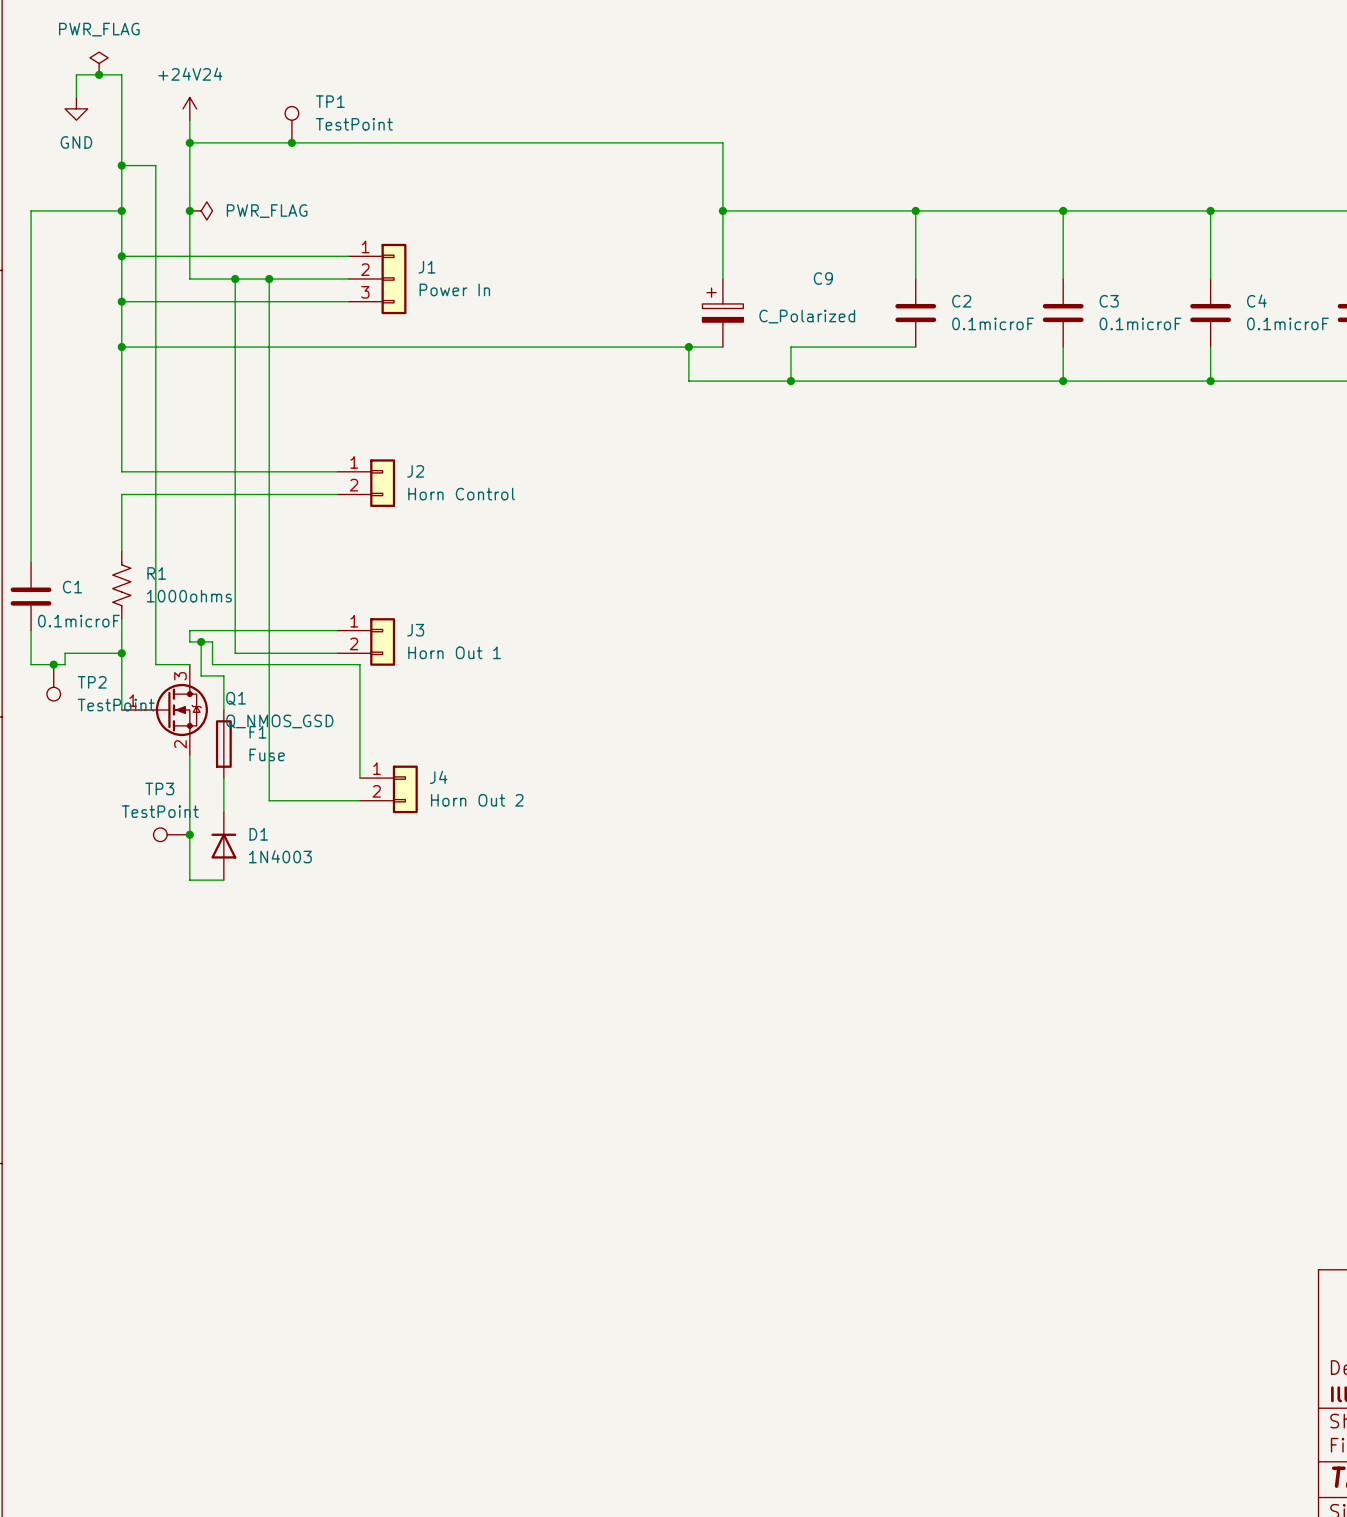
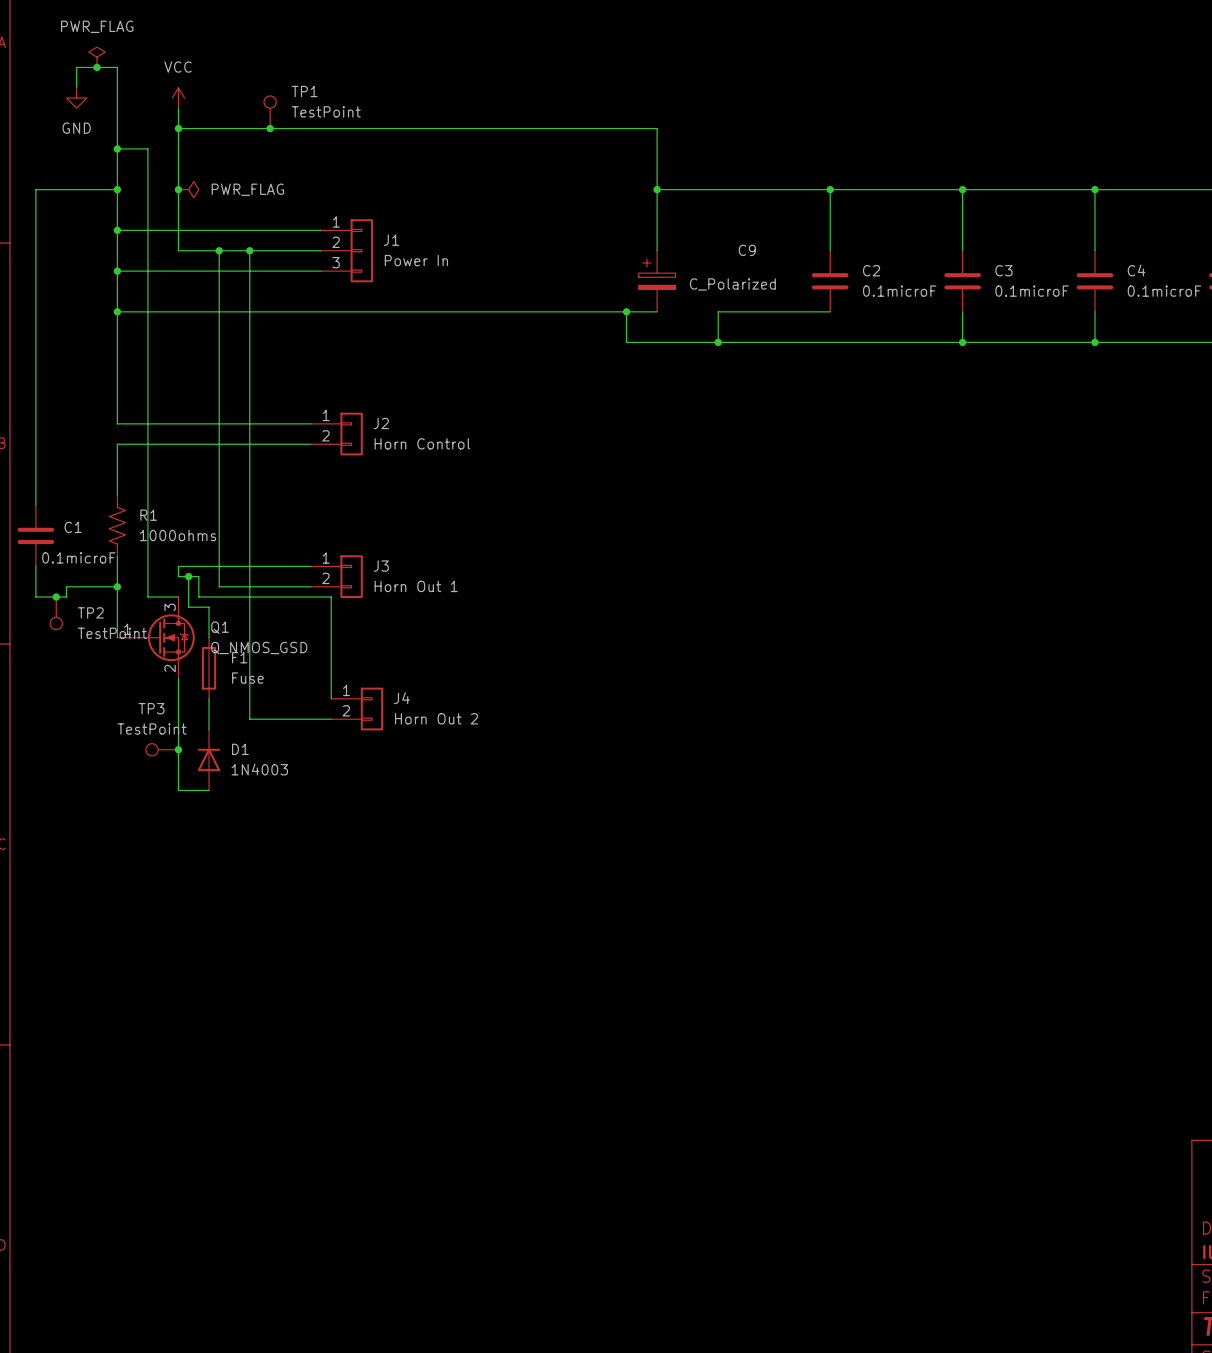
power symbol: +24V24 (189, 108) -> VCC (178, 97)

